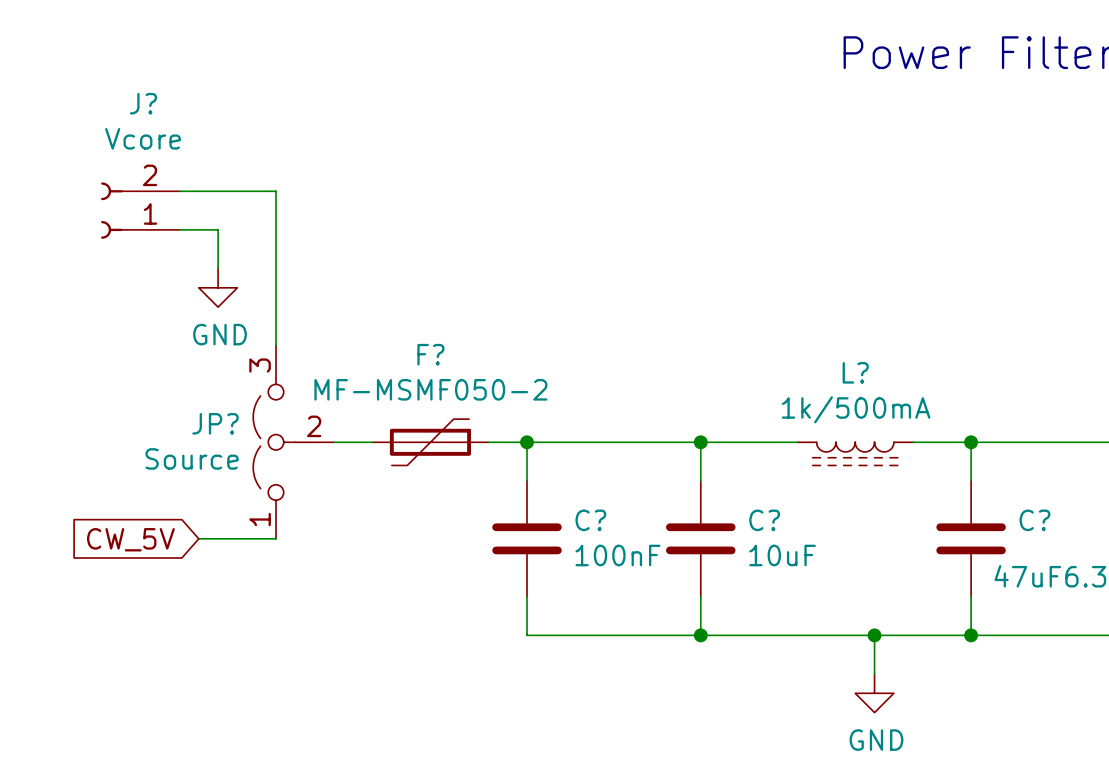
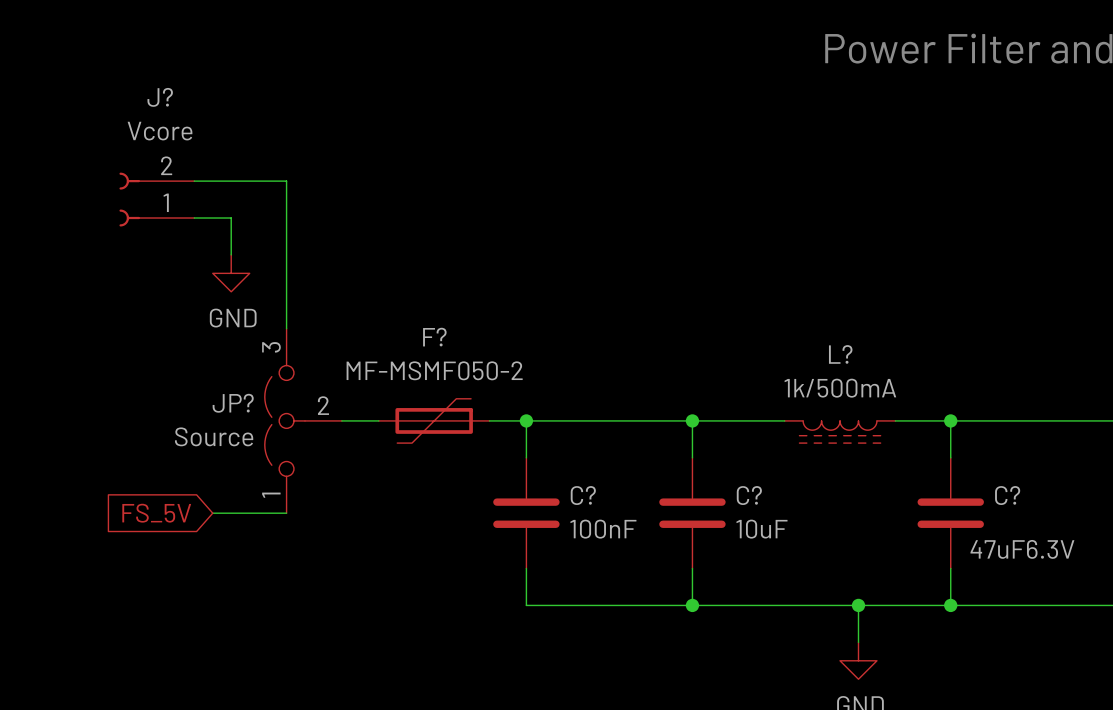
global label: CW_5V (130, 539) -> FS_5V (156, 513)

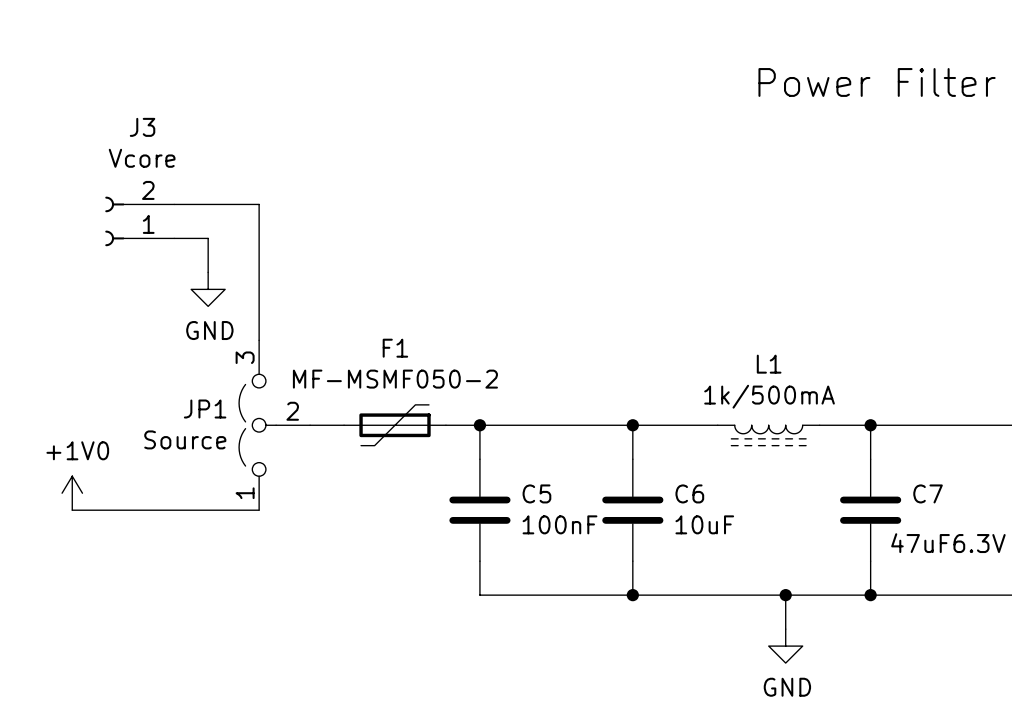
J? name: J? (160, 97) -> J3 (142, 127)
F? name: F? (434, 337) -> F1 (395, 348)
L? name: L? (840, 354) -> L1 (769, 364)
JP? name: JP? (233, 403) -> JP1 (205, 409)
power symbol: none -> +1V0 (72, 493)
C? name: C? (583, 495) -> C5 (536, 493)
C? name: C? (749, 495) -> C6 (689, 493)
C? name: C? (1007, 495) -> C7 (928, 493)
wire: none -> (72, 510) (191, 510)
global label: FS_5V (156, 513) -> none

